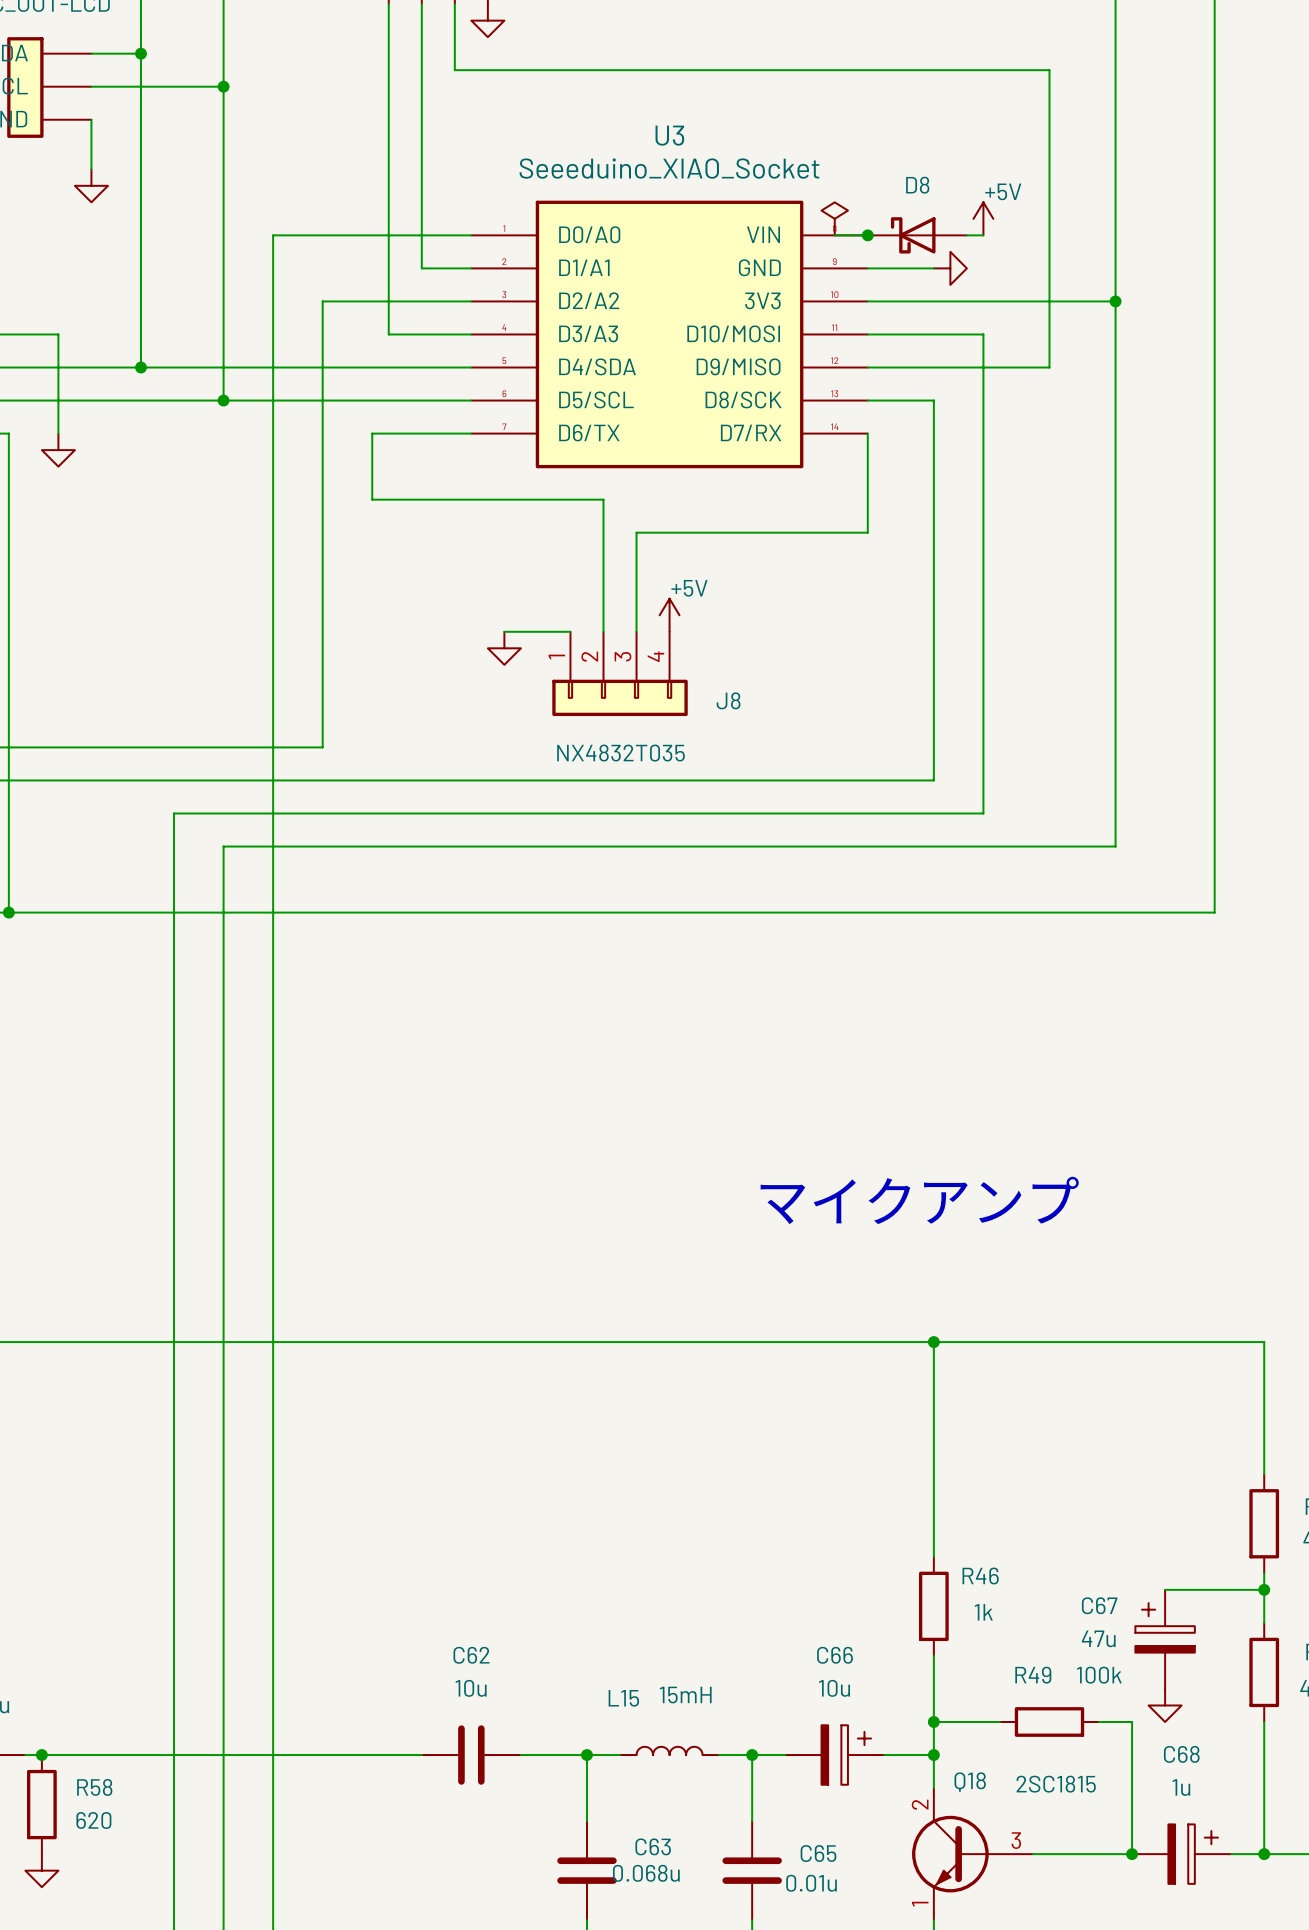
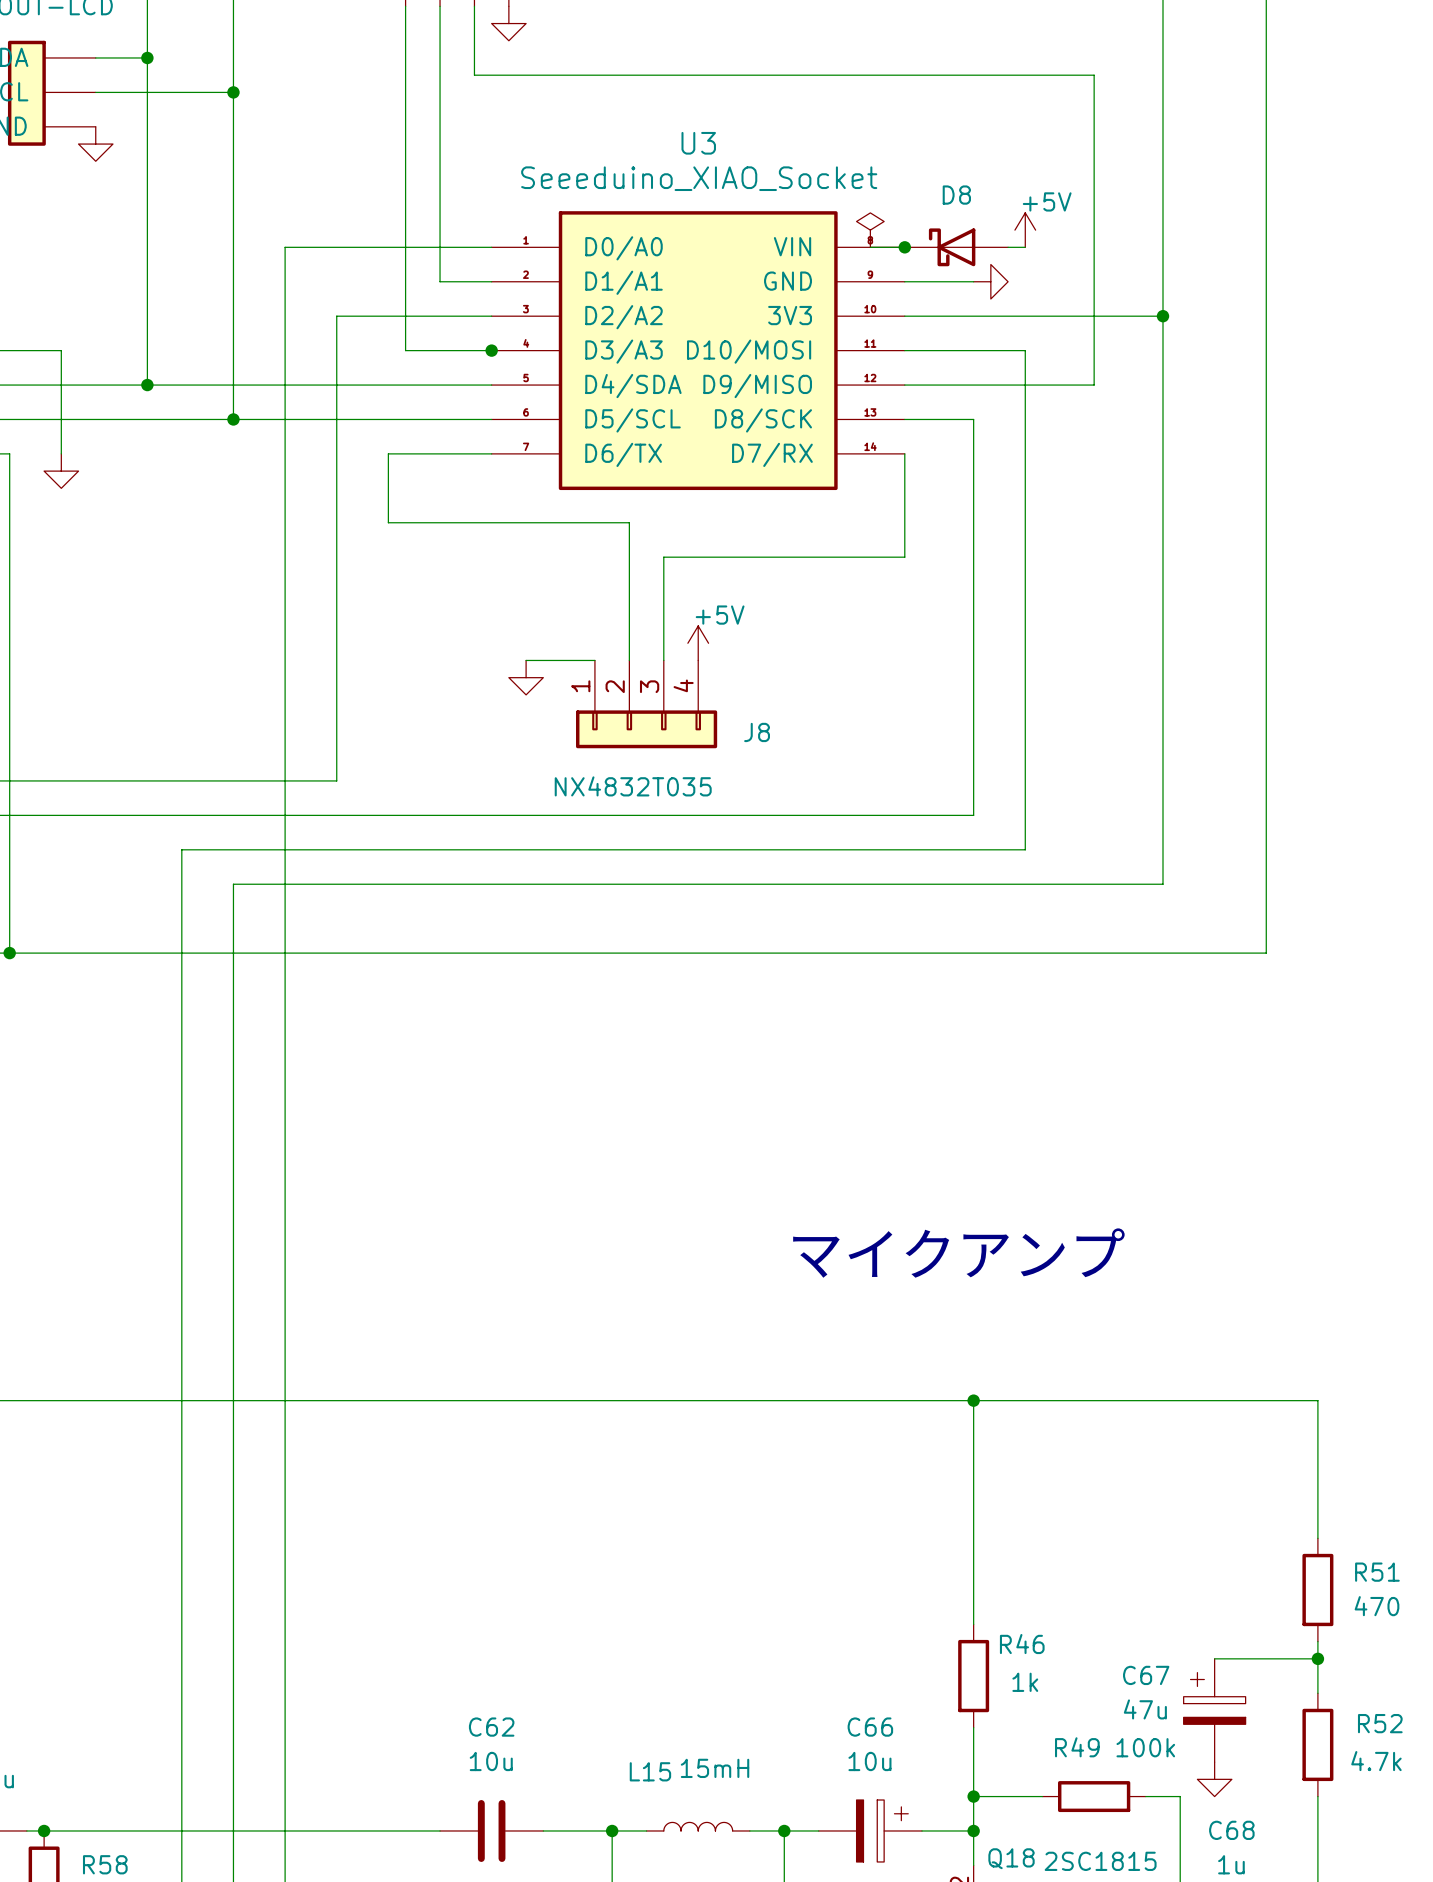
wire: (91, 119) (91, 169) -> none
power symbol position: (91, 185) -> (95, 144)
junction: none -> (491, 350)

